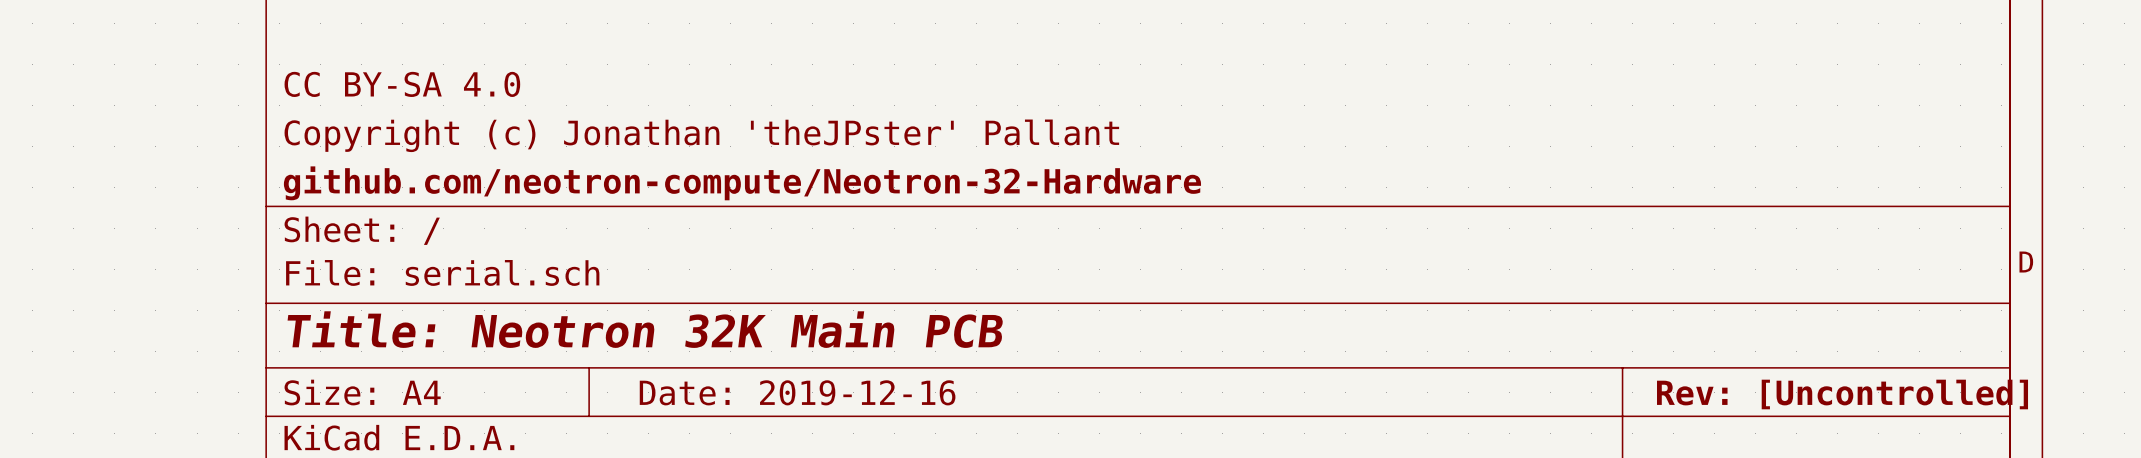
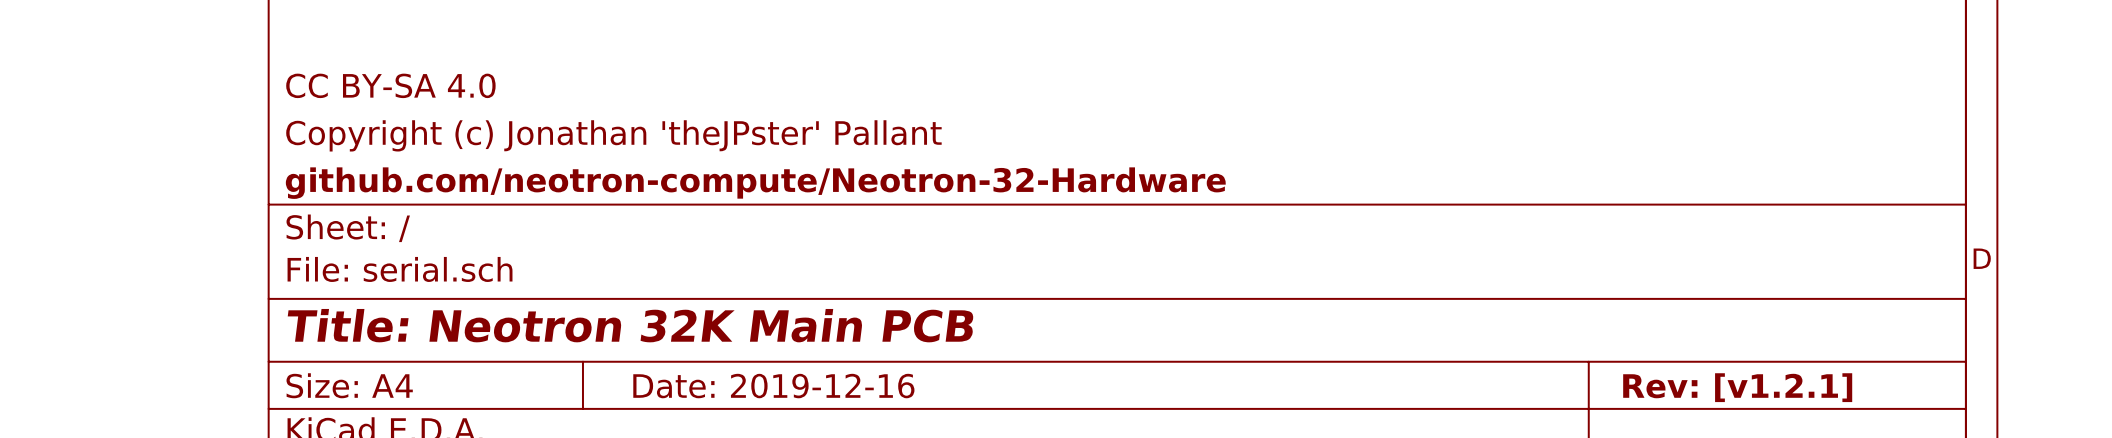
title block: Rev: [Uncontrolled] (1842, 394) -> Rev: [v1.2.1] (1737, 387)

